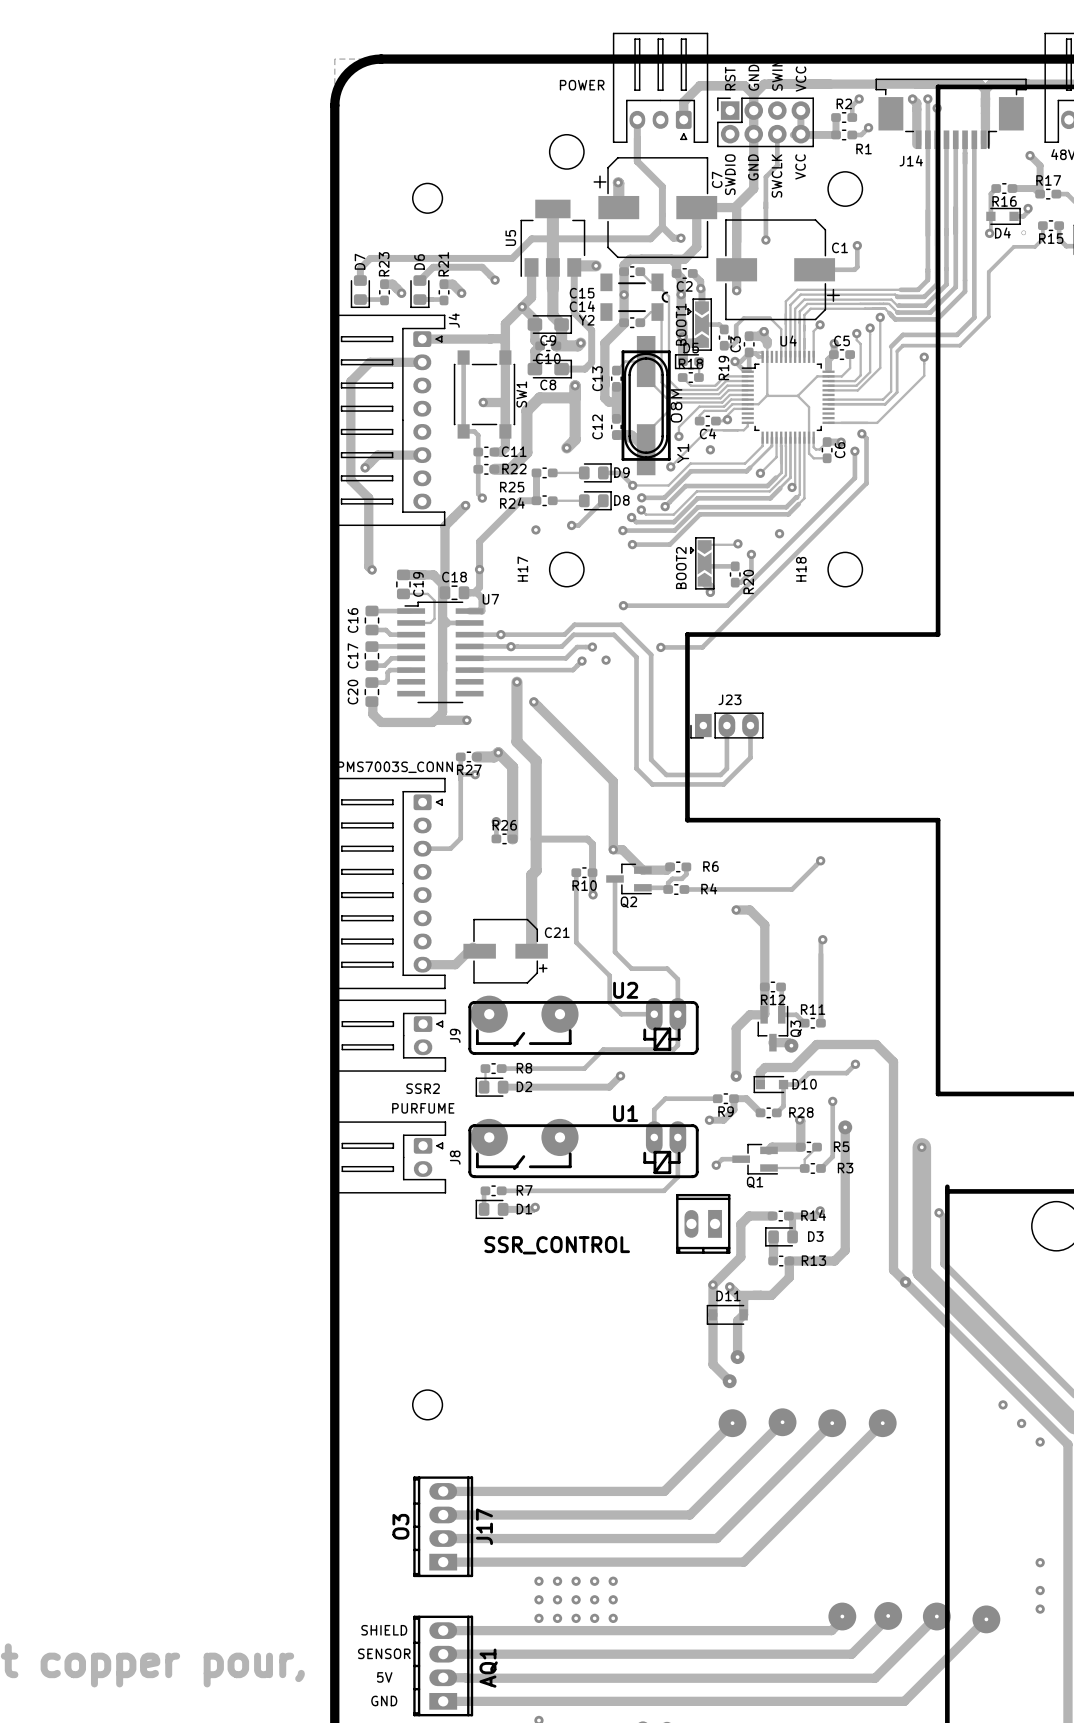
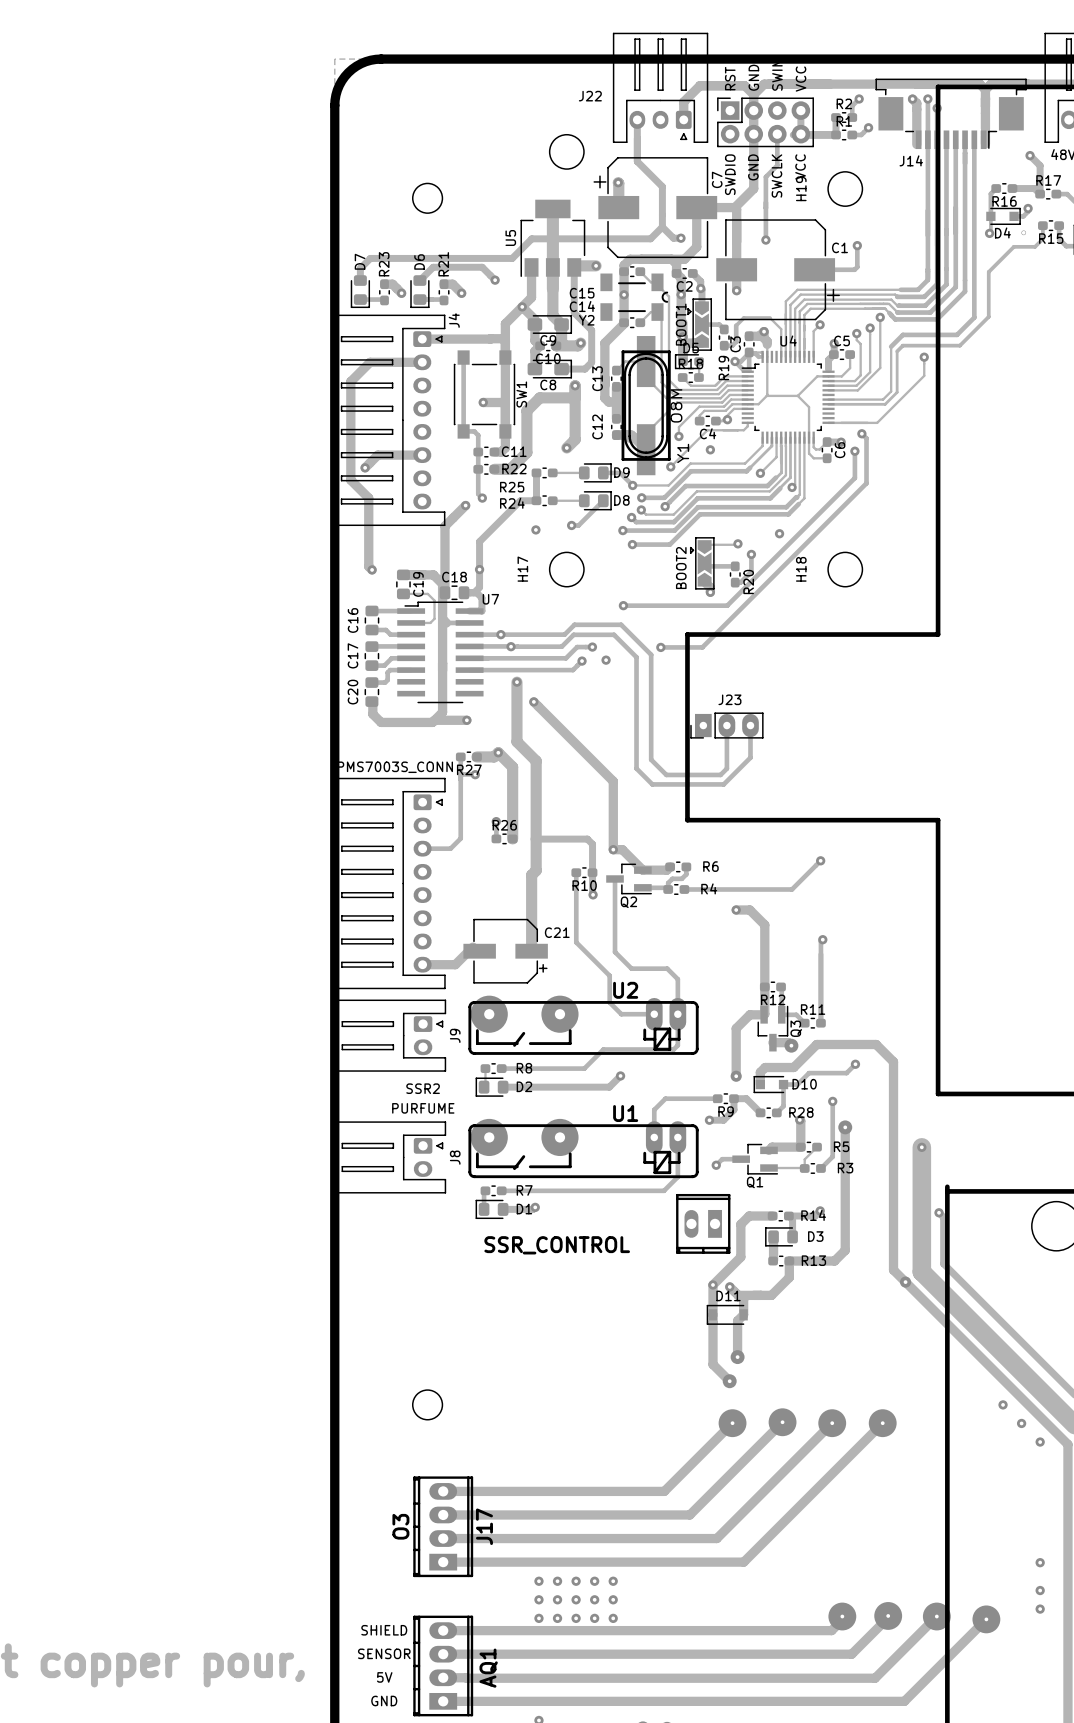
J22 value: POWER (582, 85) -> none
J22 name: none -> J22 (590, 96)
R1 name position: R1 (864, 149) -> R1 (844, 121)
H19 name: none -> H19 (801, 188)

